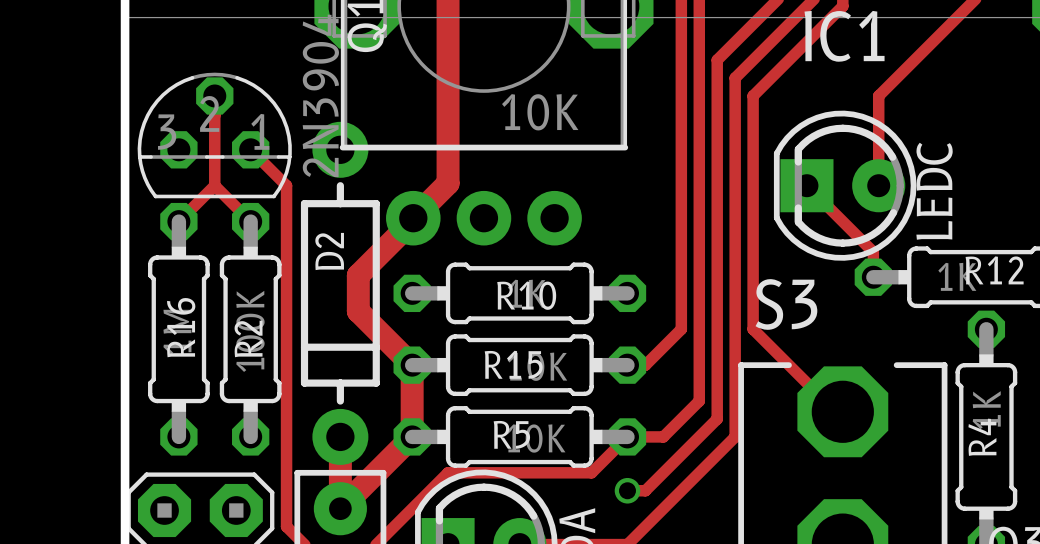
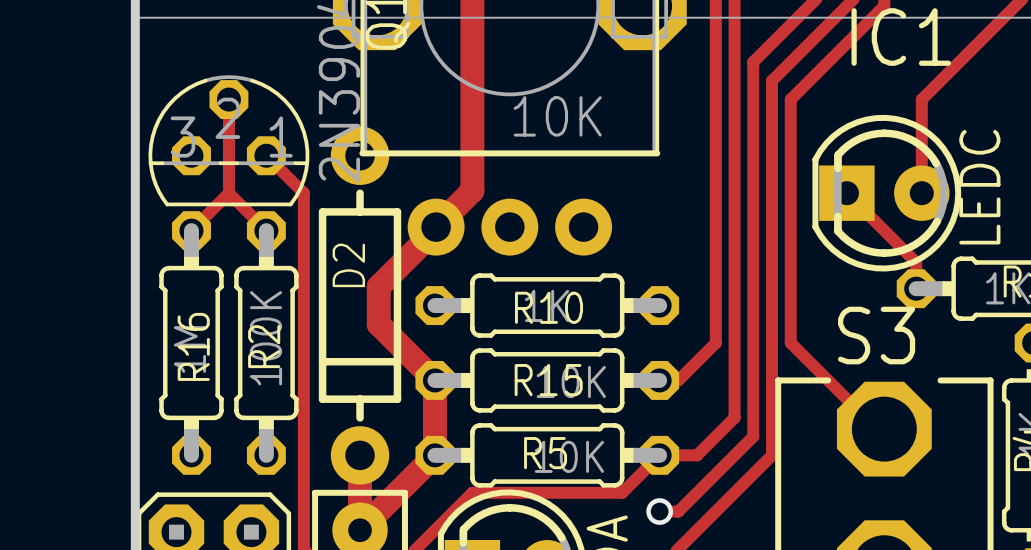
S3 name position: S3 (786, 304) -> S3 (876, 335)

